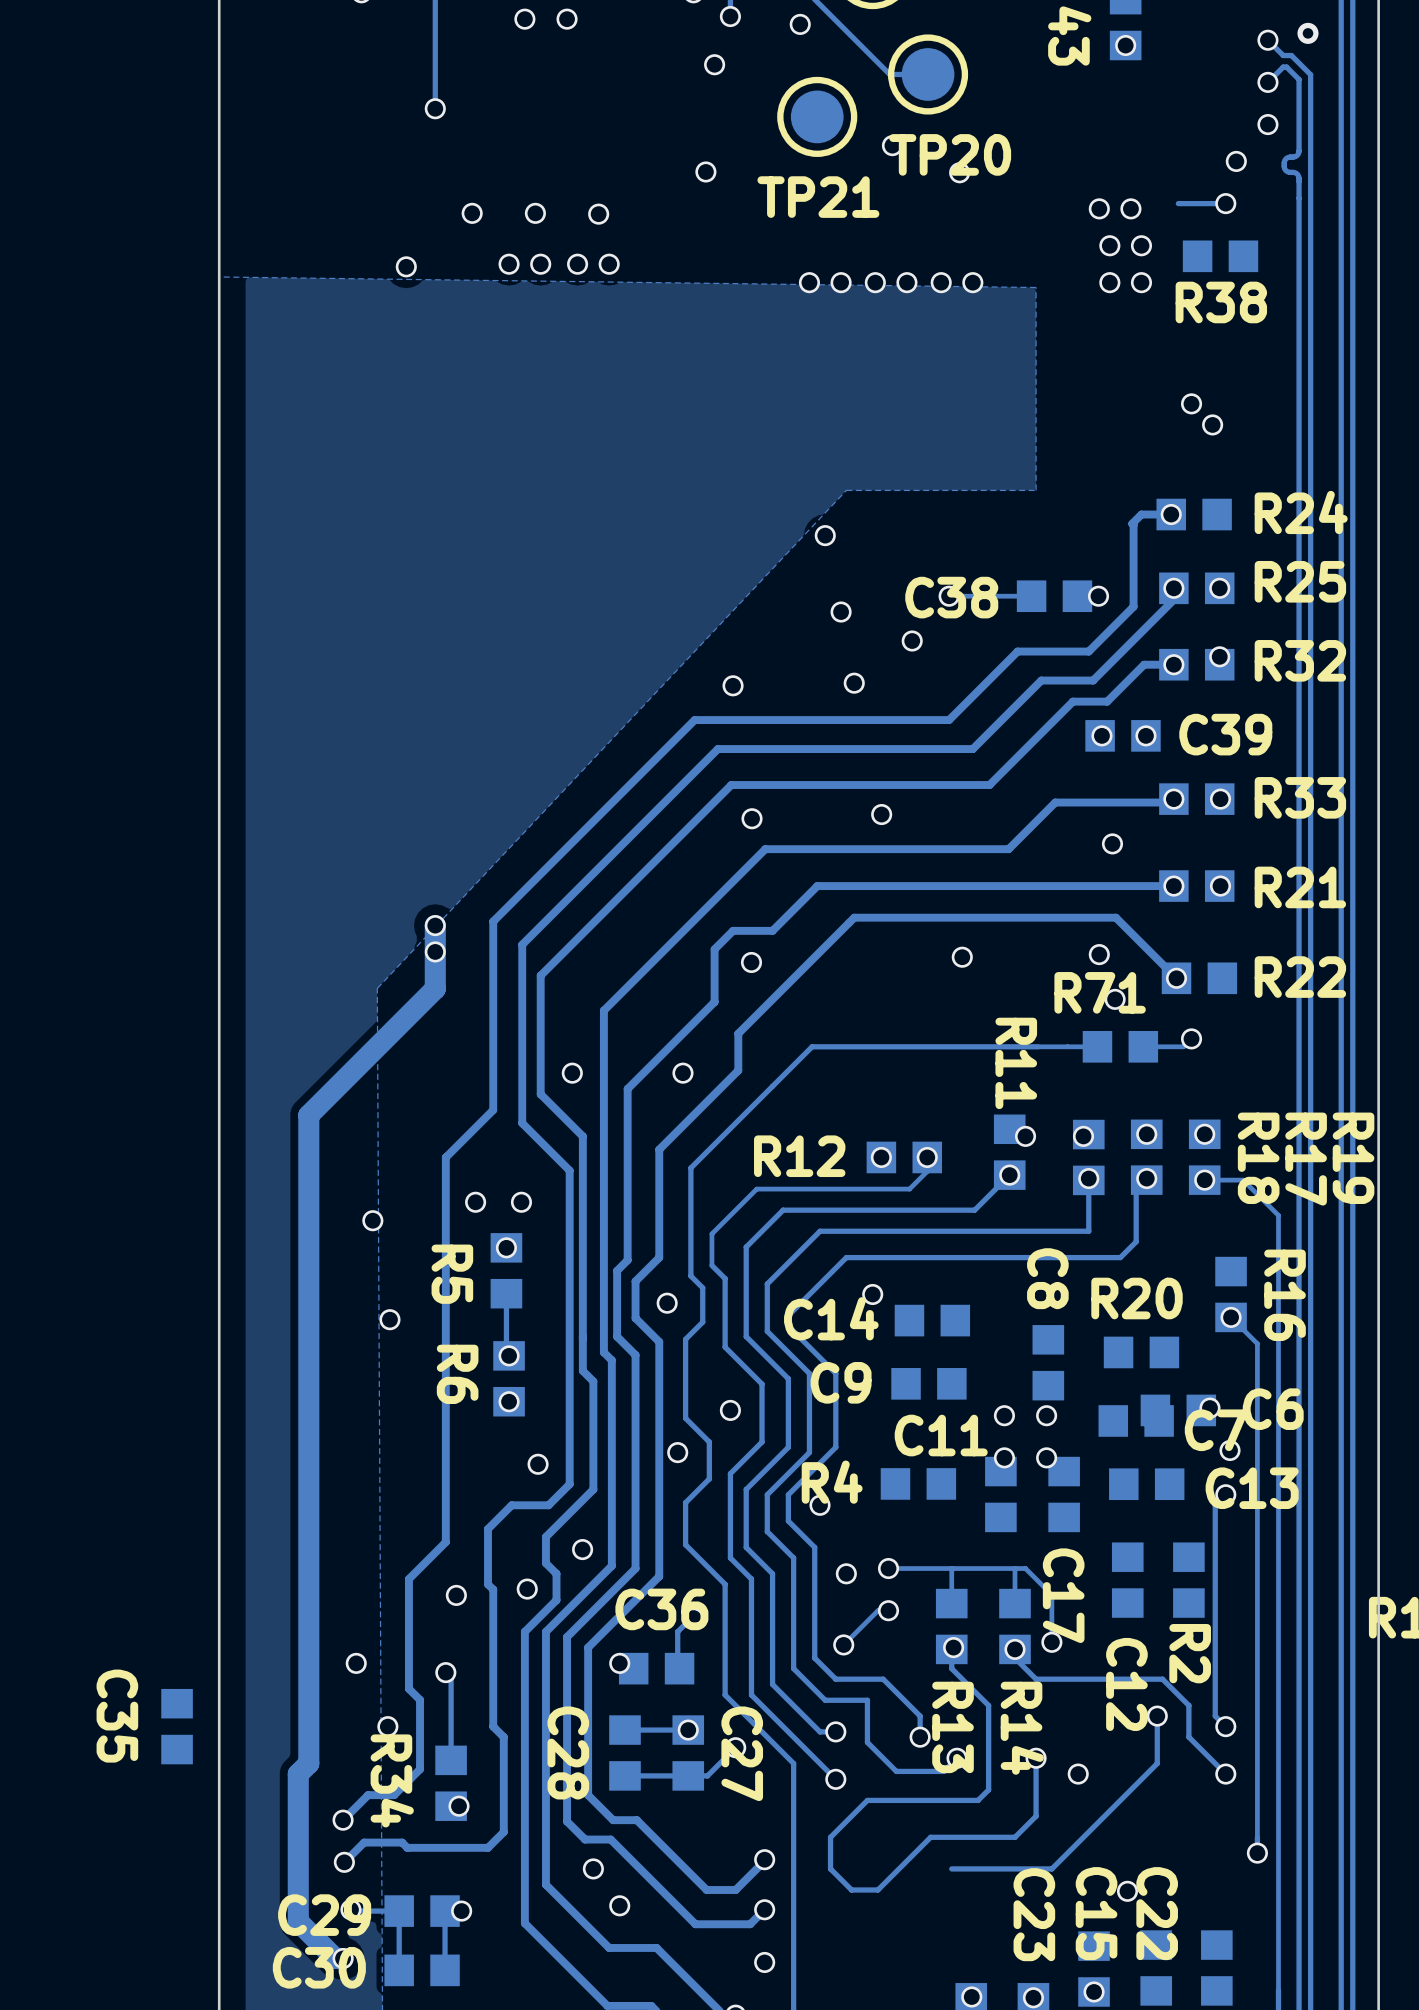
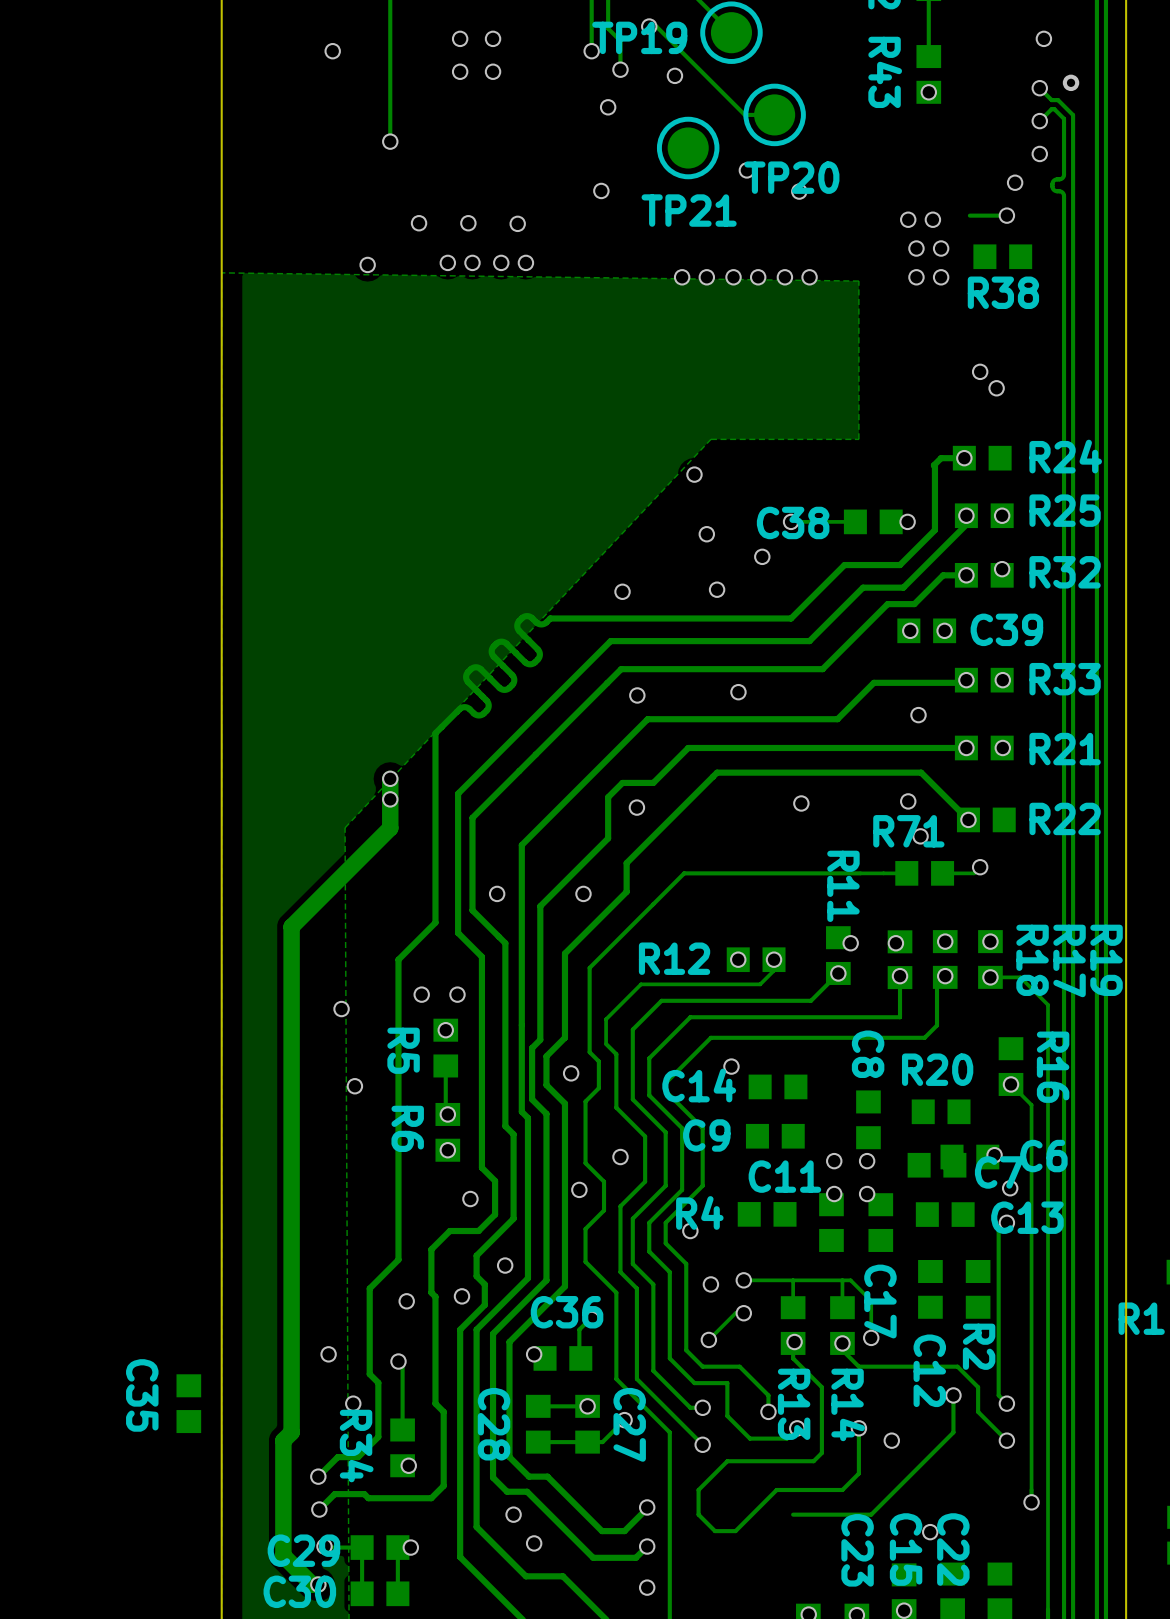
track: (694, 720) (493, 921) -> (592, 618) (550, 618) (541, 624) (529, 616) (522, 617) (517, 623) (517, 629) (538, 650) (539, 656) (534, 662) (528, 664) (505, 642) (499, 641) (493, 646) (491, 650) (492, 655) (514, 678) (513, 683) (507, 689) (500, 688) (479, 668) (470, 669) (466, 674) (466, 680) (487, 701) (488, 707) (483, 713) (478, 715) (467, 707) (461, 707) (435, 733) (435, 775)
track: (552, 1153) (569, 1170) (569, 1441) -> (481, 956) (481, 1167) (495, 1180)

